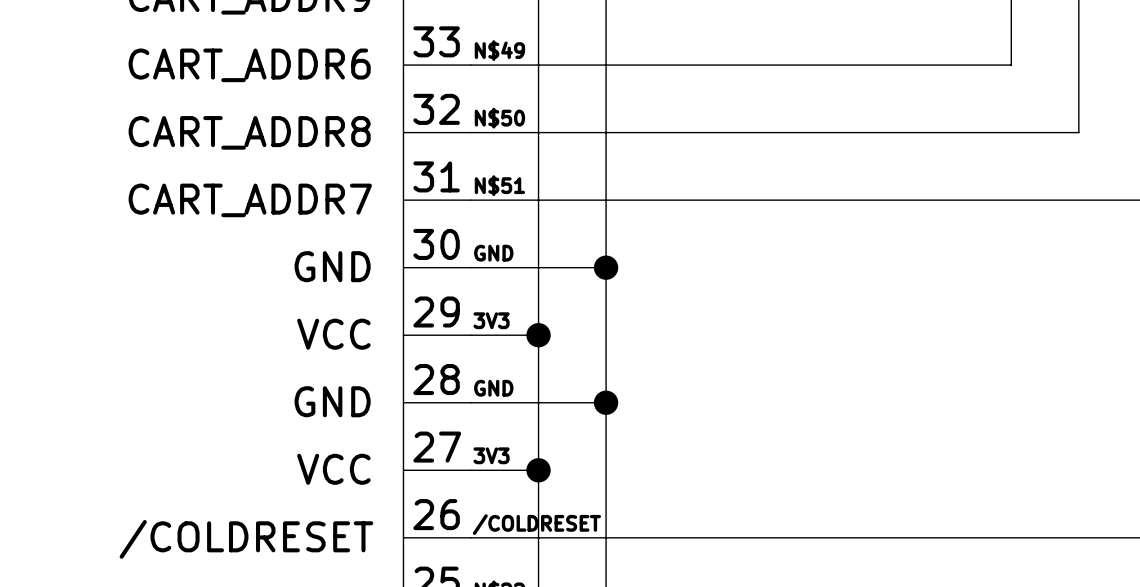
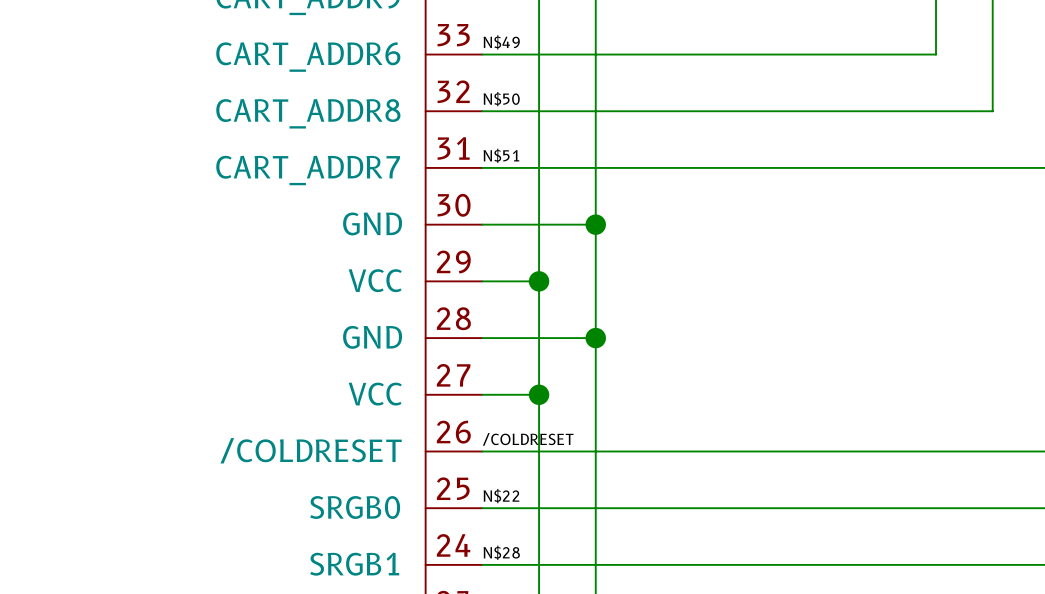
label: GND (493, 253) -> none
label: 3V3 (491, 320) -> none
label: GND (493, 388) -> none
label: 3V3 (491, 455) -> none

